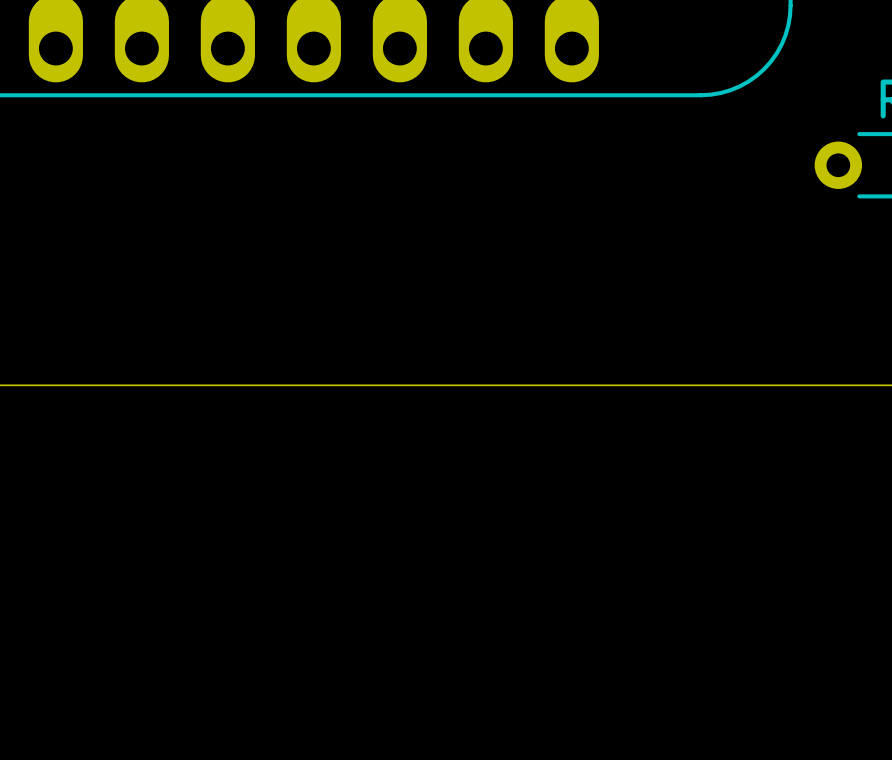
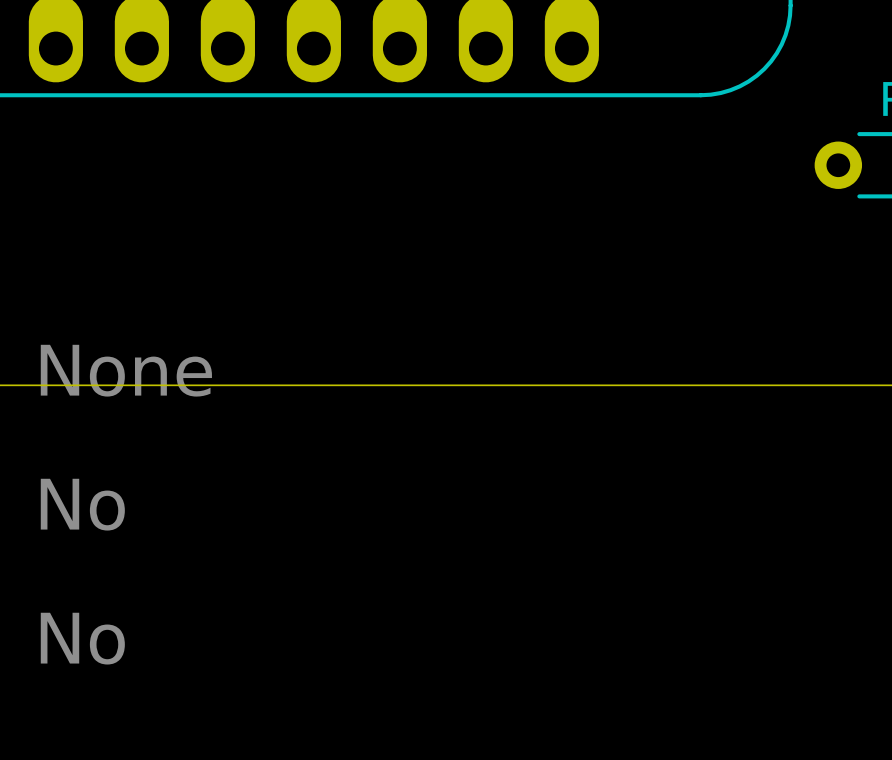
text: none -> None (126, 370)
text: none -> No (82, 504)
text: none -> No (82, 638)

